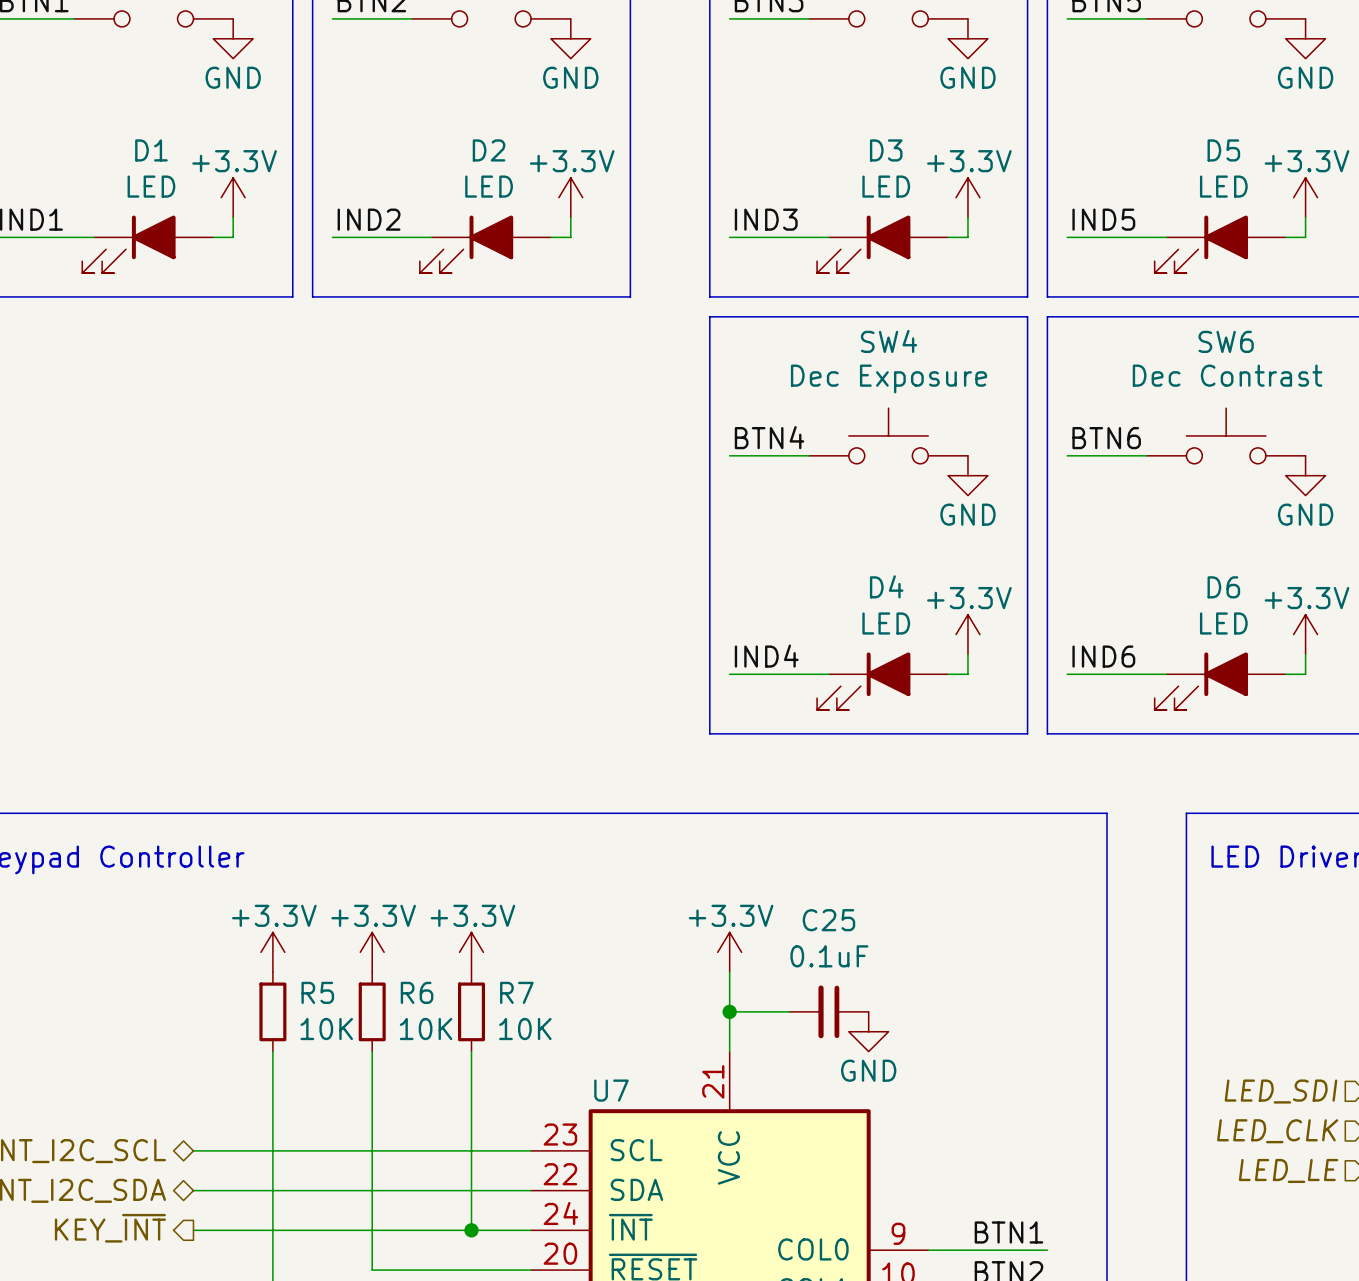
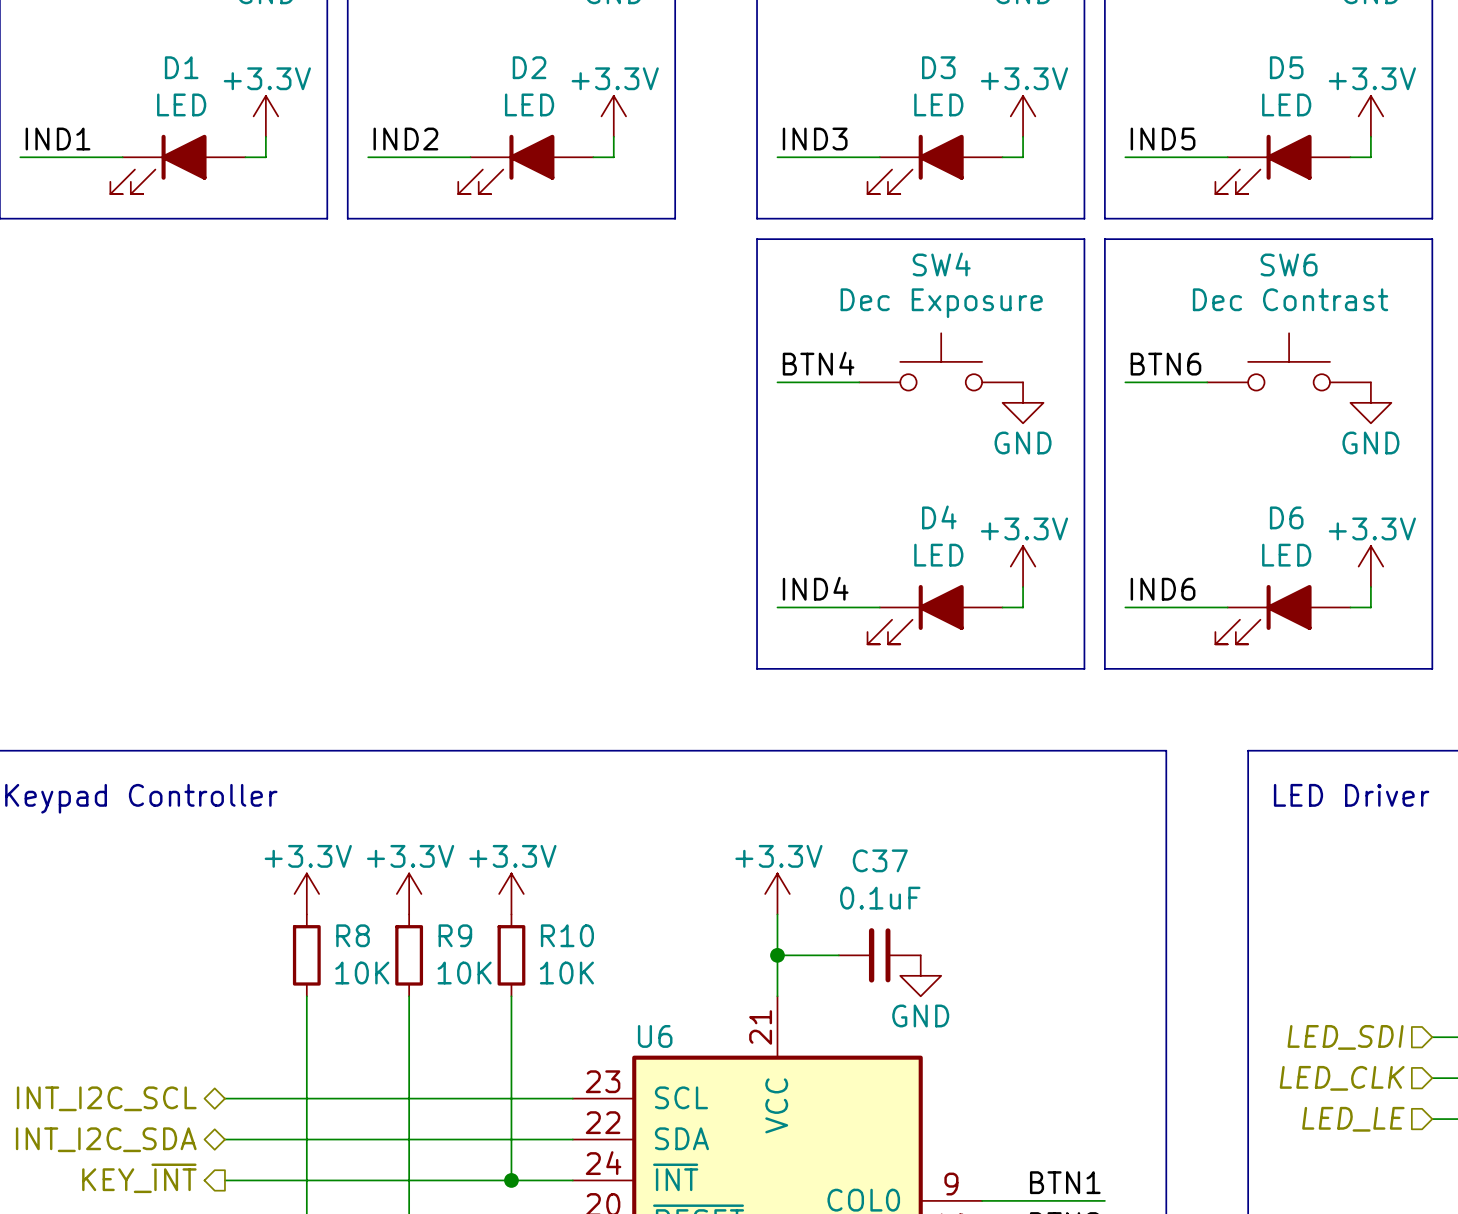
C25 name: C25 (828, 920) -> C37 (880, 860)
R5 name: R5 (317, 992) -> R8 (353, 935)
R6 name: R6 (417, 992) -> R9 (455, 935)
R7 name: R7 (516, 992) -> R10 (567, 935)
U7 name: U7 (611, 1090) -> U6 (655, 1036)

